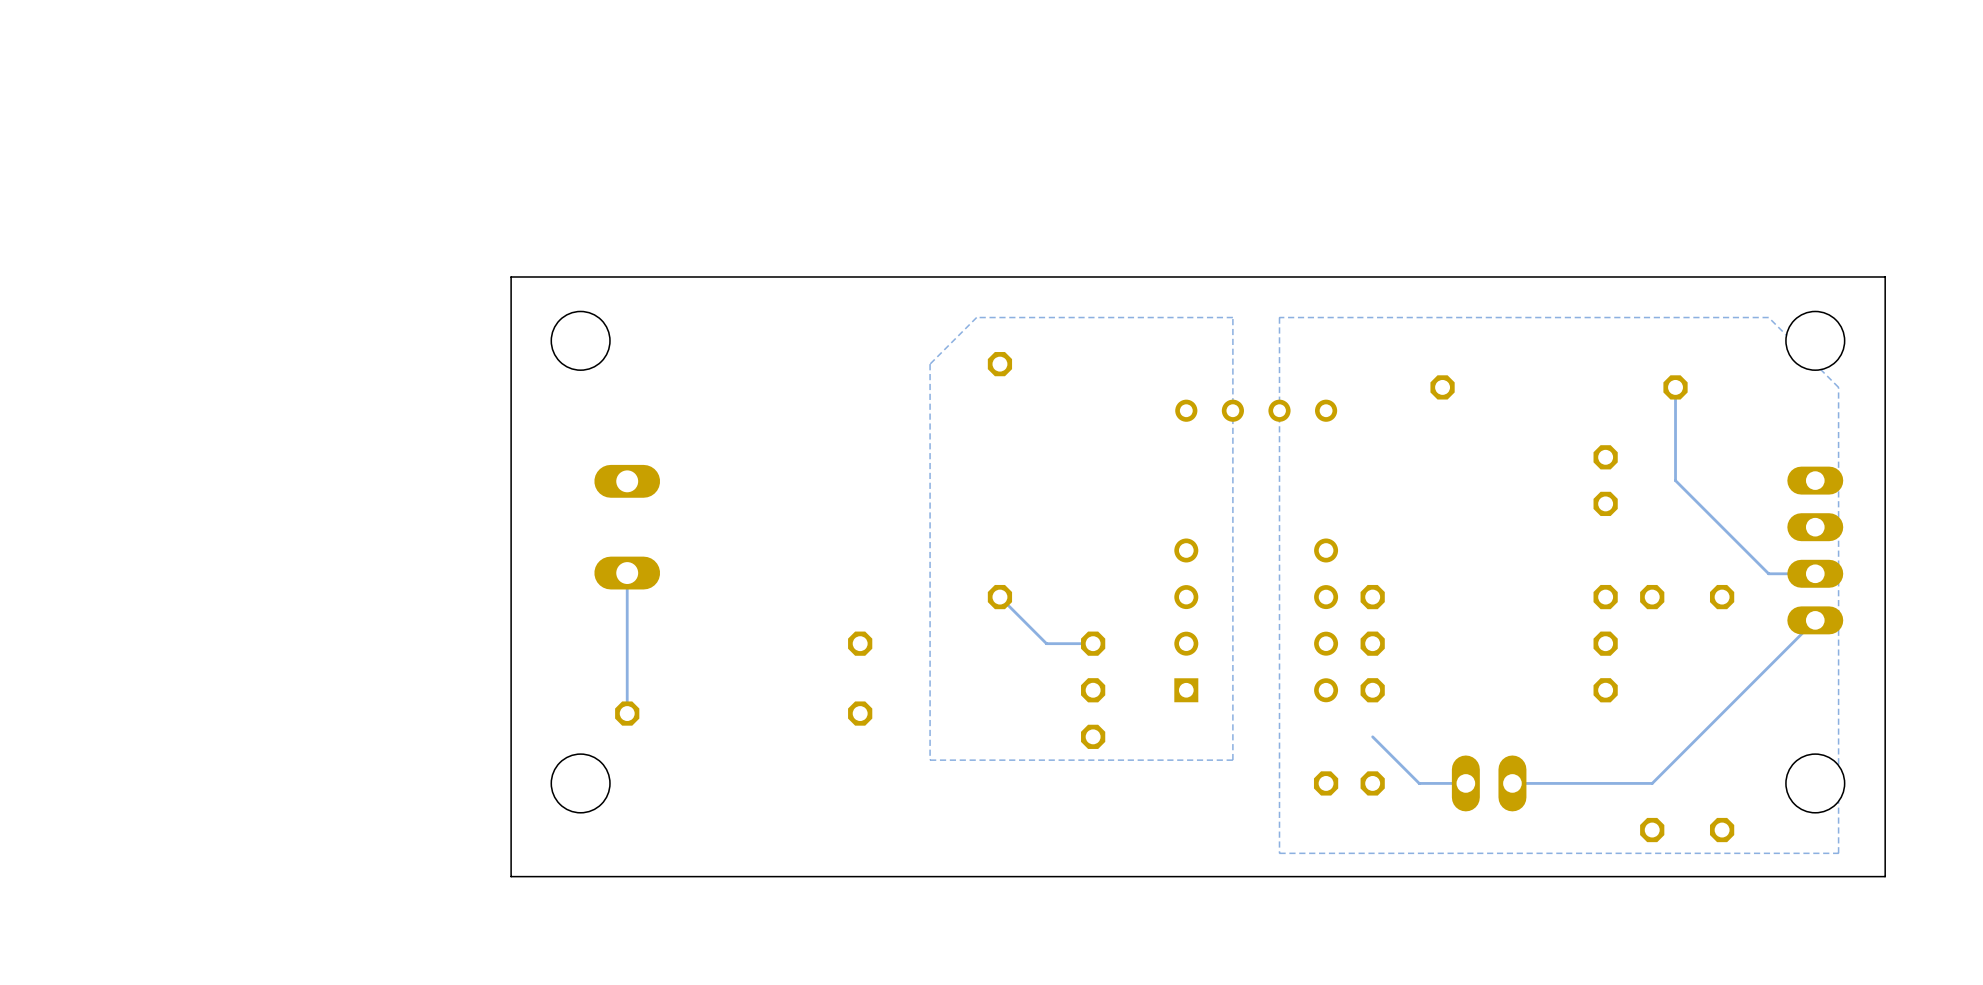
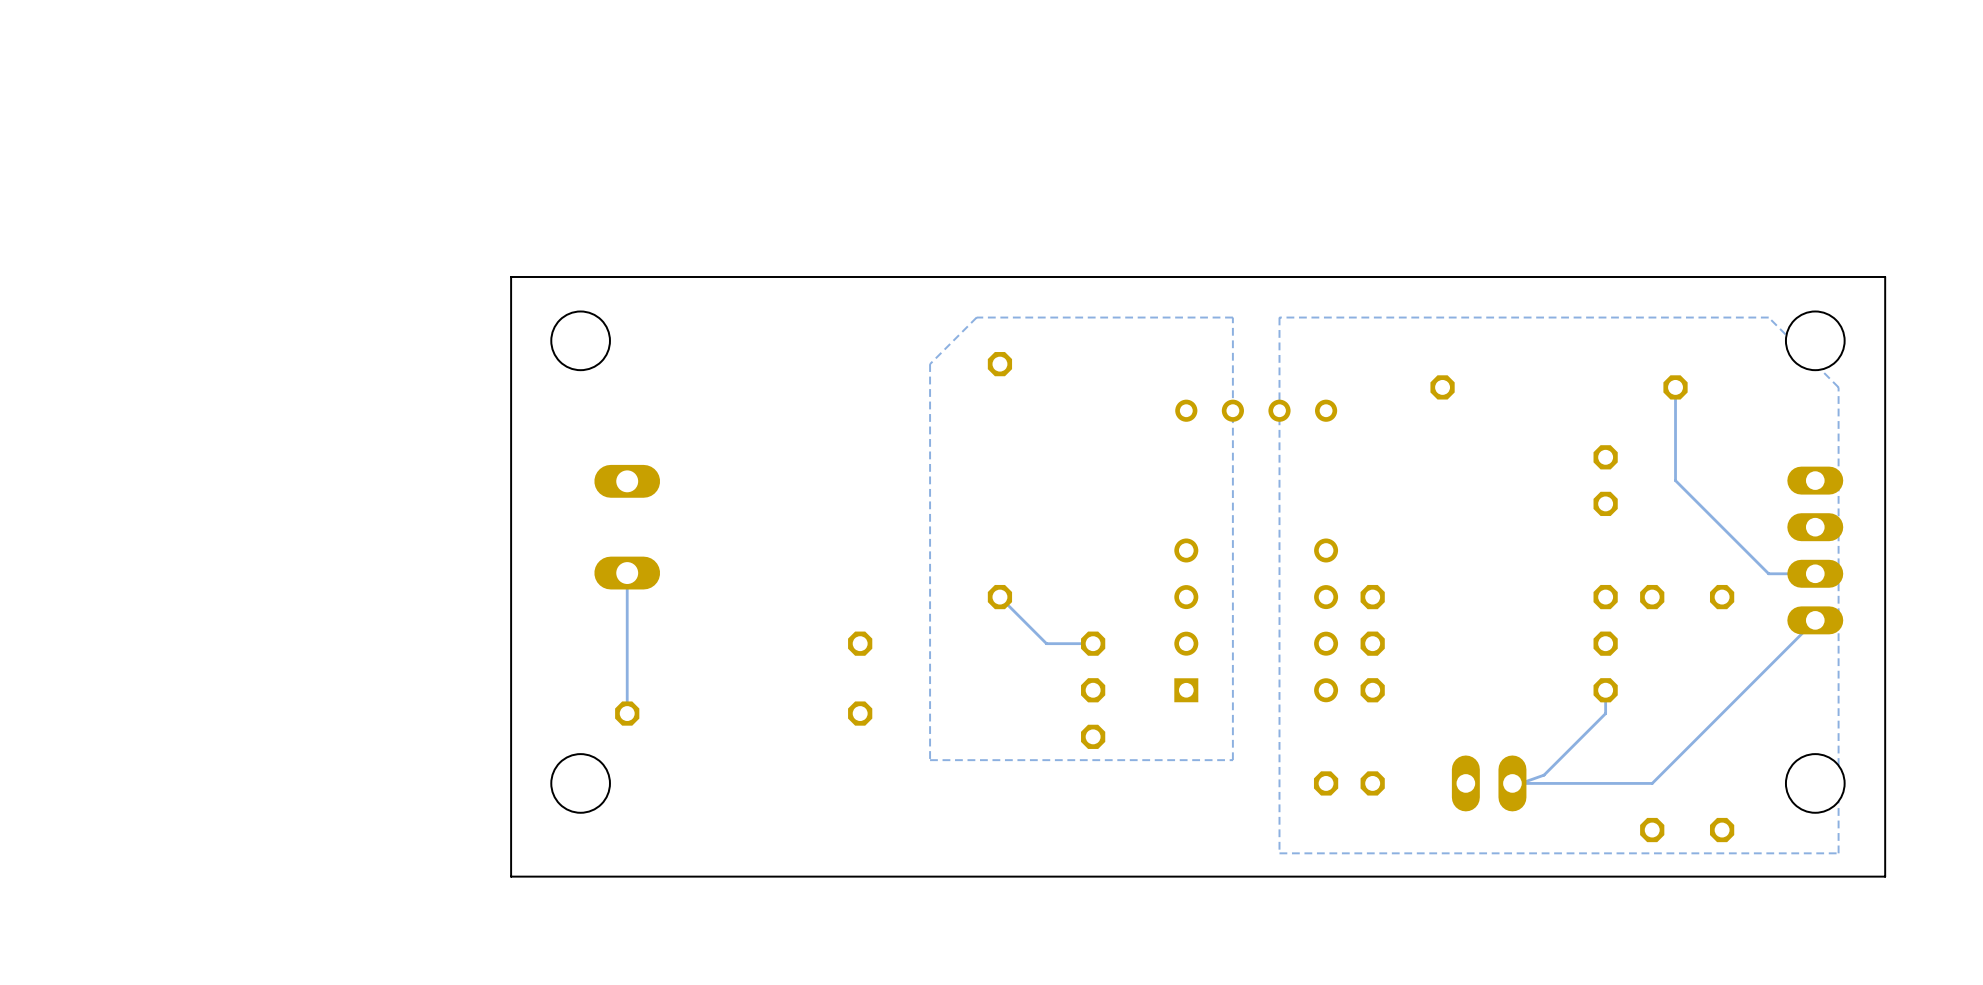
track: none -> (1605, 690) (1605, 713) (1544, 775) (1520, 783)
track: (1372, 736) (1419, 783) (1465, 783) -> none

